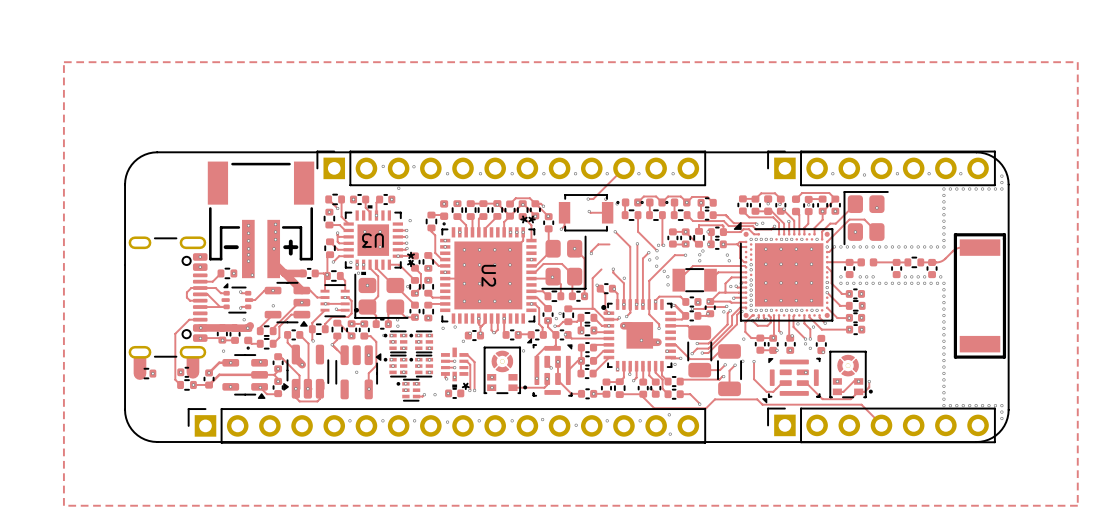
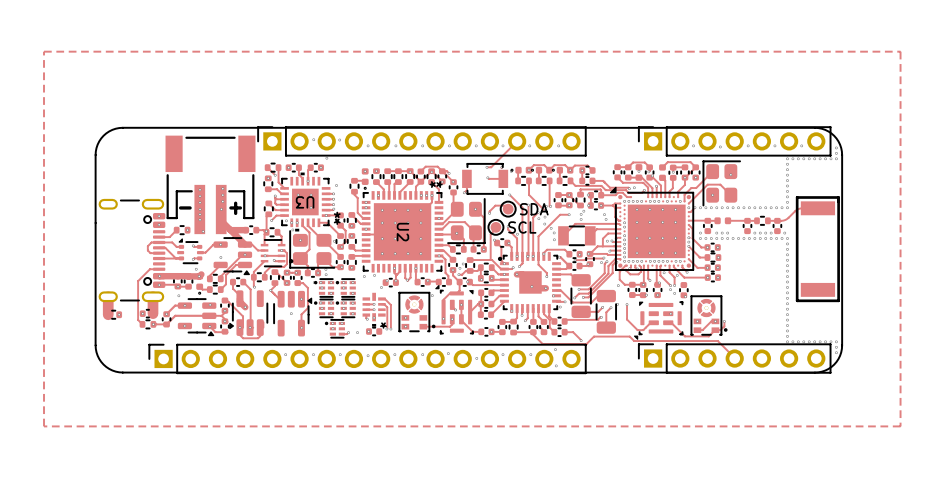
part: none -> (508, 209)
text: none -> SDA (534, 209)
part: none -> (495, 227)
text: none -> SCL (522, 227)

